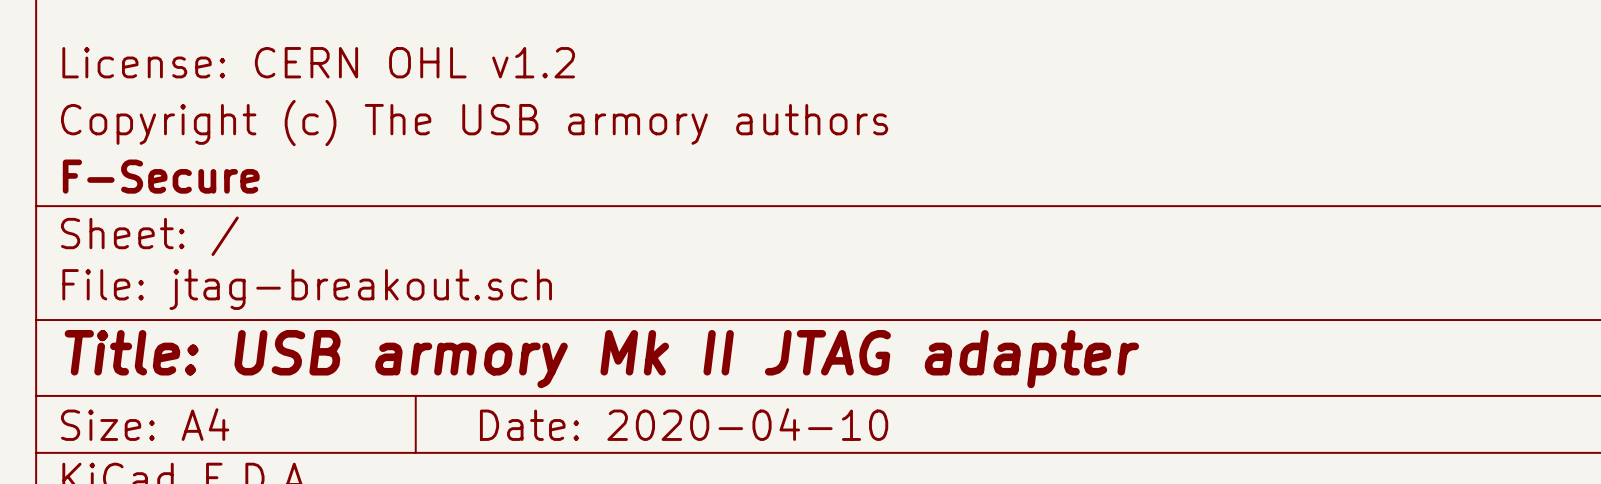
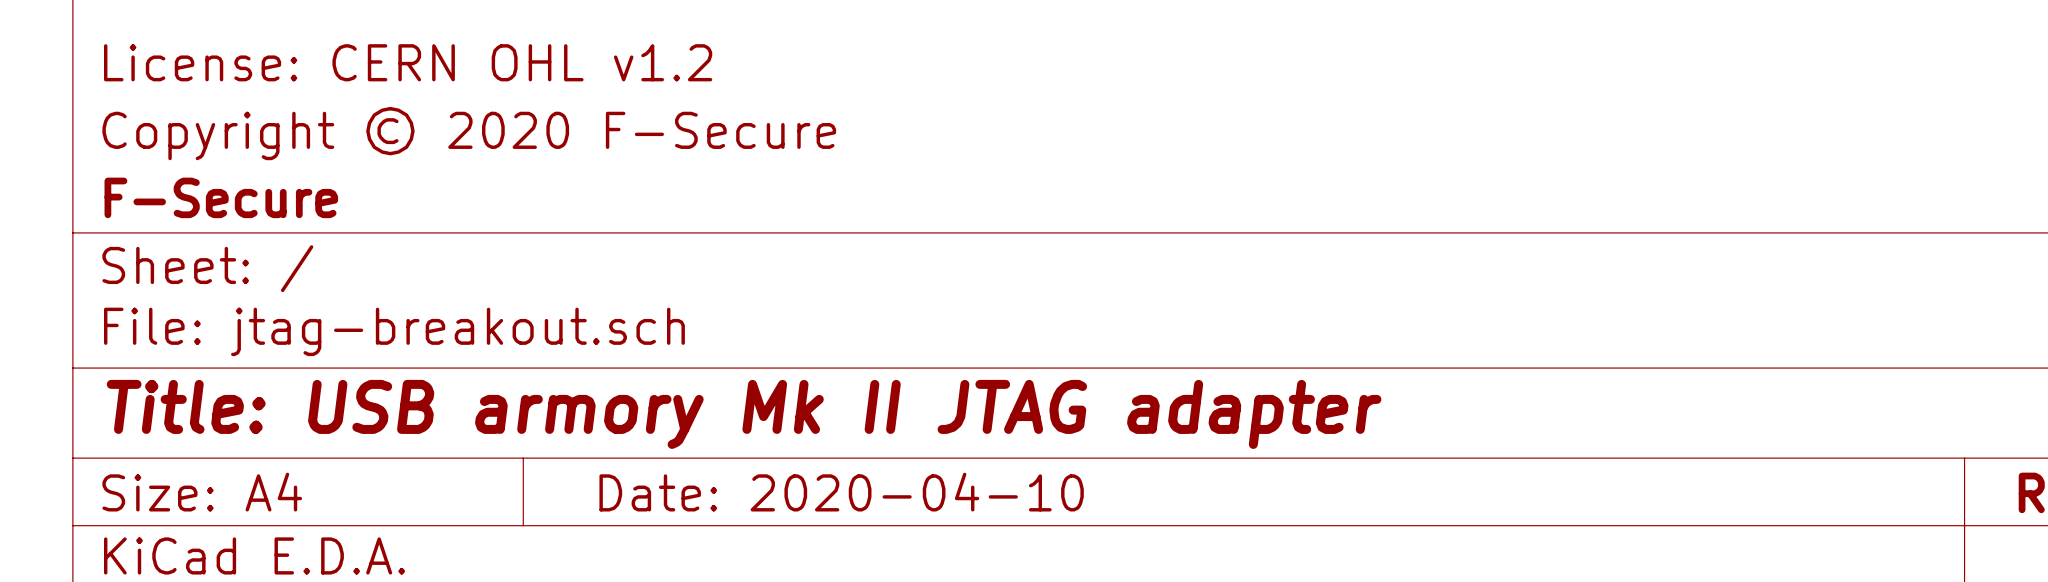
title block: Copyright (c) The USB armory authors (474, 123) -> Copyright © 2020 F-Secure (469, 133)

